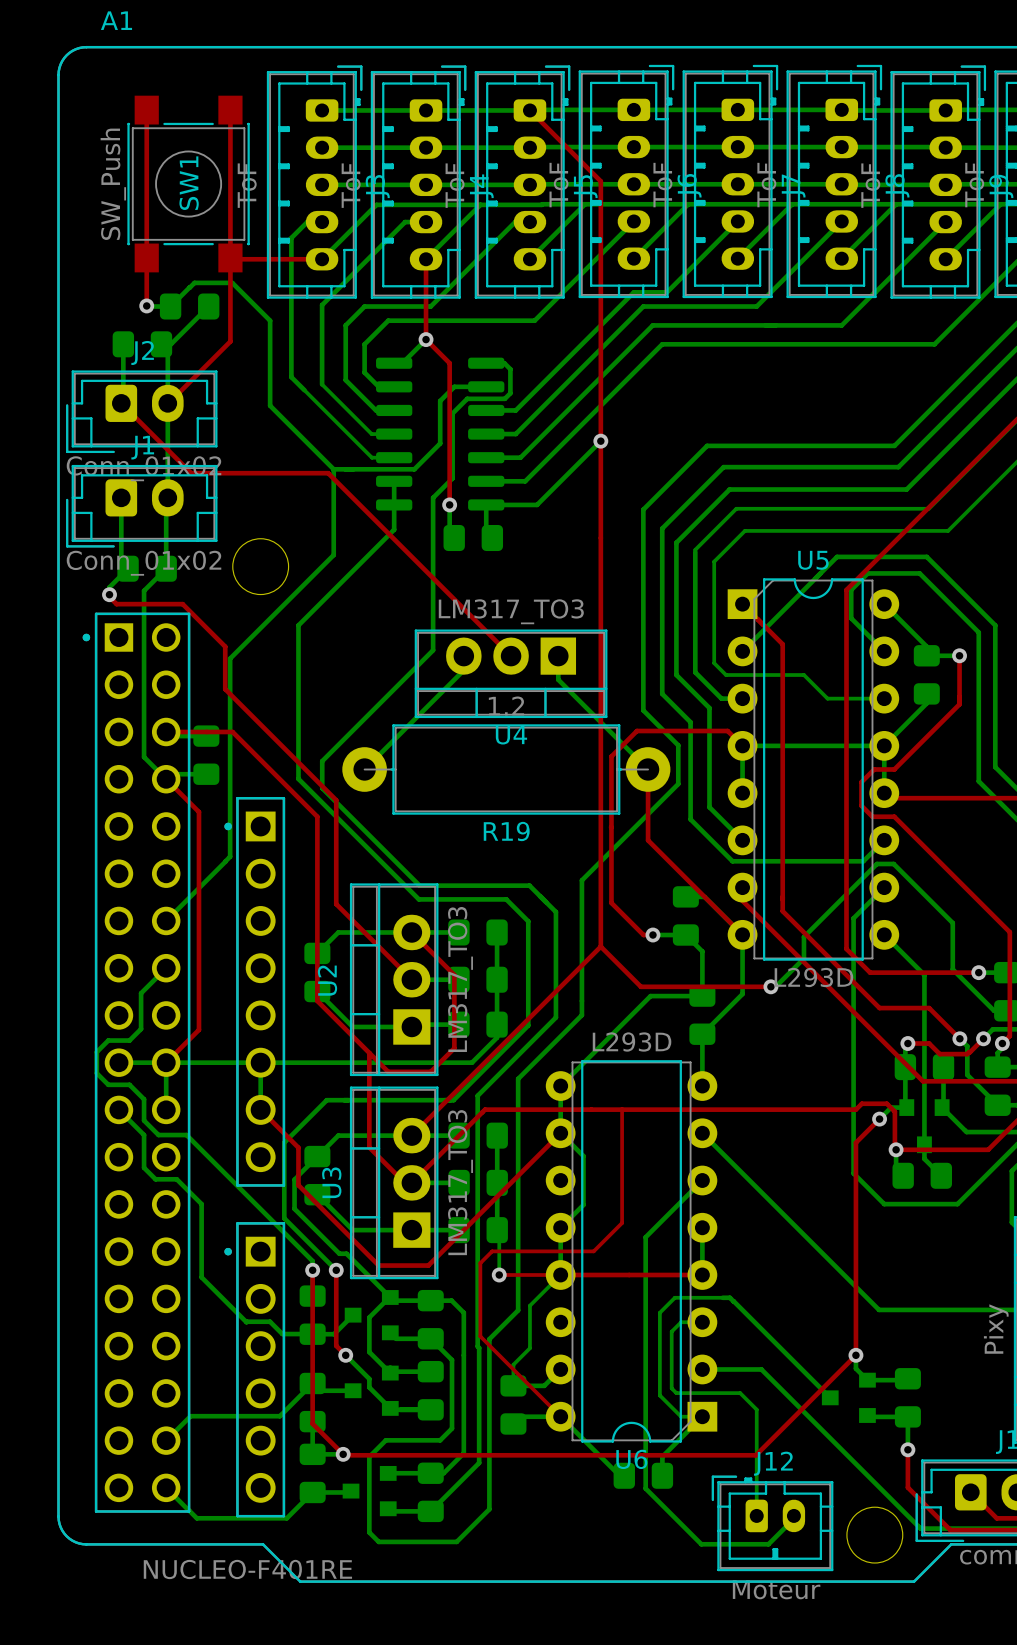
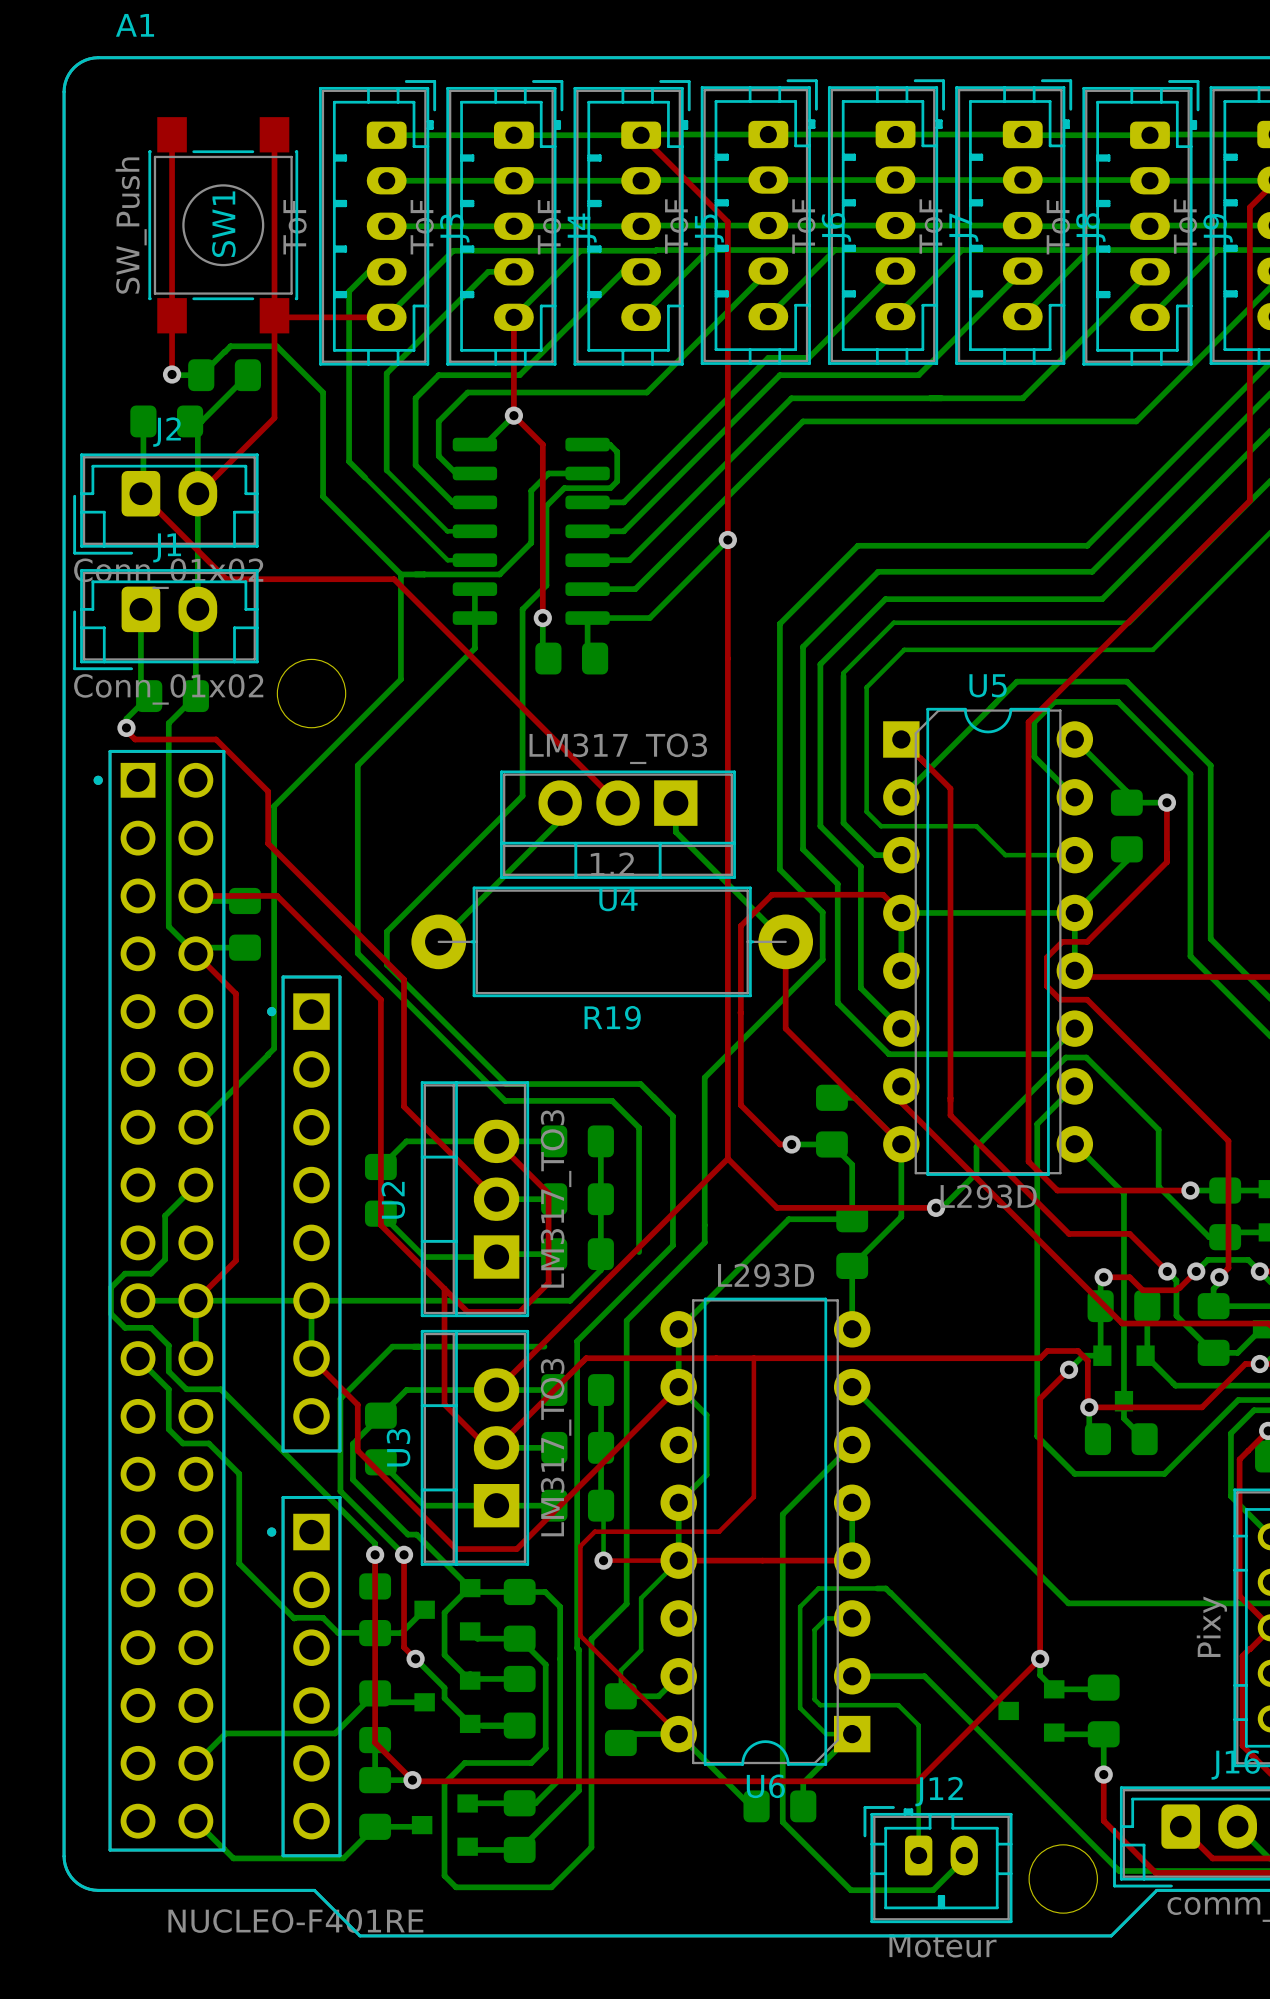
bottom track: (528, 1022) (528, 1025) (453, 1100) (451, 1100) -> none

